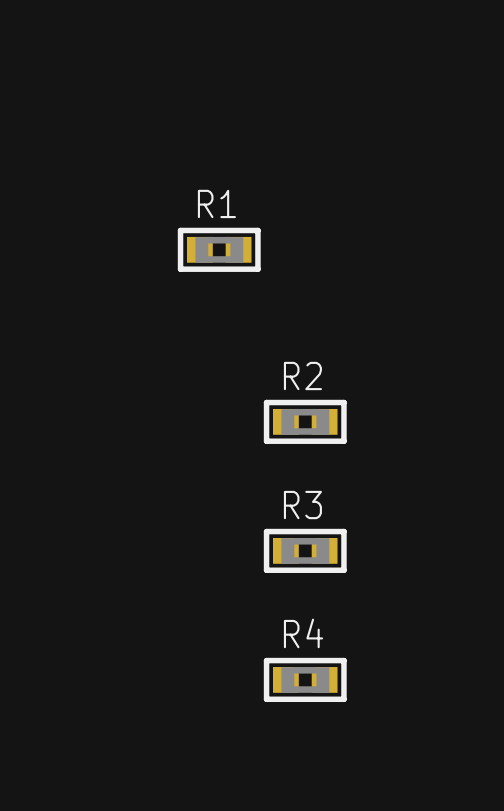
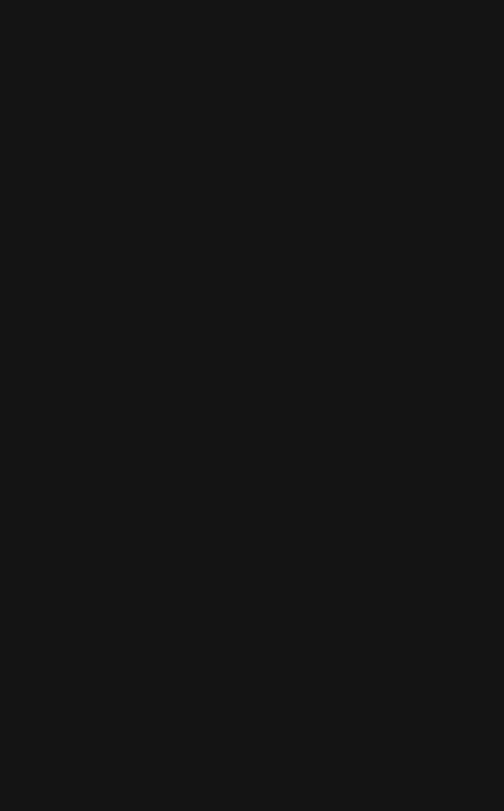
R1: (219, 249) -> none
R2: (305, 421) -> none
R3: (305, 550) -> none
R4: (305, 679) -> none

